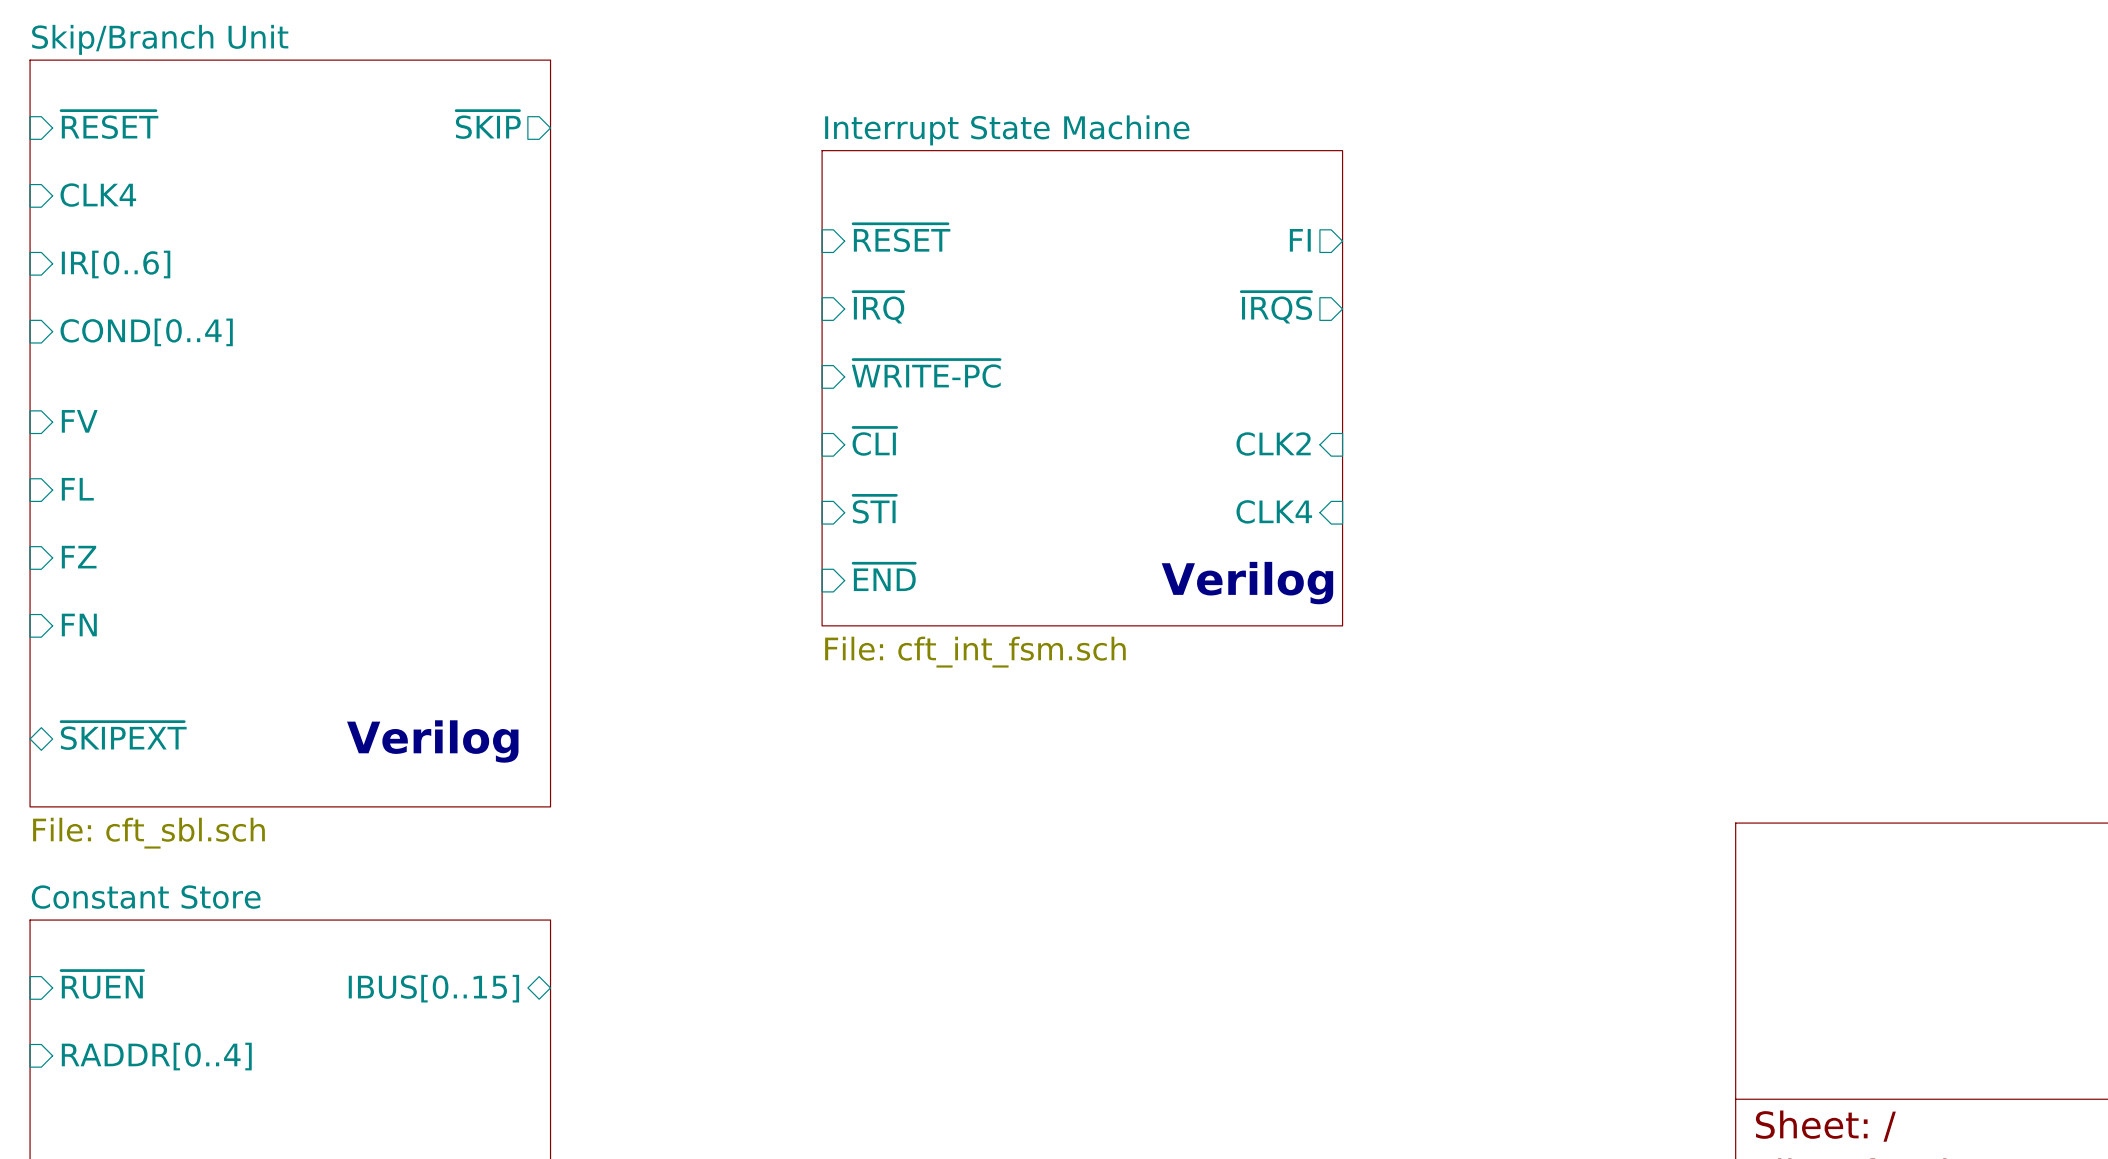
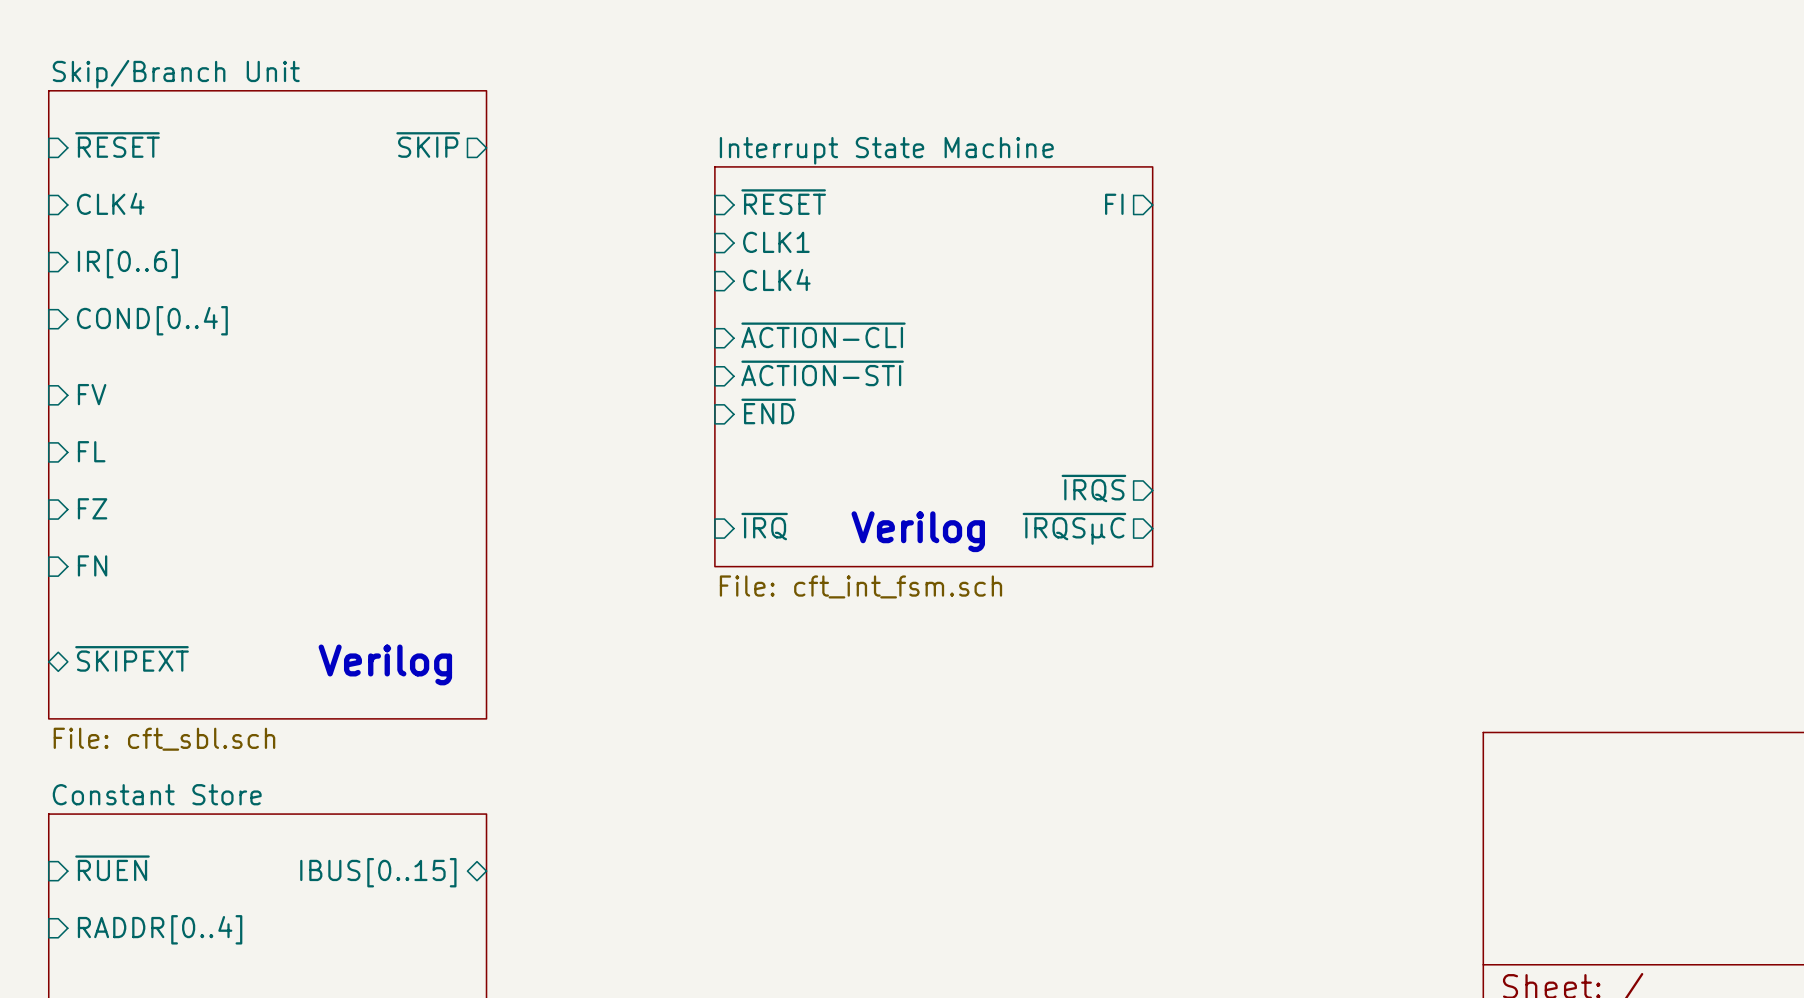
sheet pin: none -> ~{RESET} (783, 202)
sheet pin: ~{RESET} (901, 237) -> CLK1 (776, 242)
sheet pin position: FI (1300, 240) -> FI (1114, 204)
sheet pin: none -> CLK4 (776, 279)
sheet pin: ~{IRQ} (878, 307) -> none
sheet pin position: ~{IRQS} (1276, 307) -> ~{IRQS} (1093, 488)
sheet pin: none -> ~{ACTION-CLI} (823, 335)
sheet pin: ~{WRITE-PC} (926, 373) -> none
sheet pin: none -> ~{ACTION-STI} (822, 373)
sheet pin: ~{CLI} (874, 441) -> ~{END} (768, 411)
sheet pin: CLK2 (1273, 443) -> none
sheet pin: ~{STI} (874, 509) -> none
sheet pin: CLK4 (1274, 511) -> none
sheet pin: ~{END} (884, 577) -> ~{IRQ} (764, 526)
sheet pin: none -> ~{IRQSµC} (1074, 528)
text position: Verilog (1247, 583) -> Verilog (918, 531)

